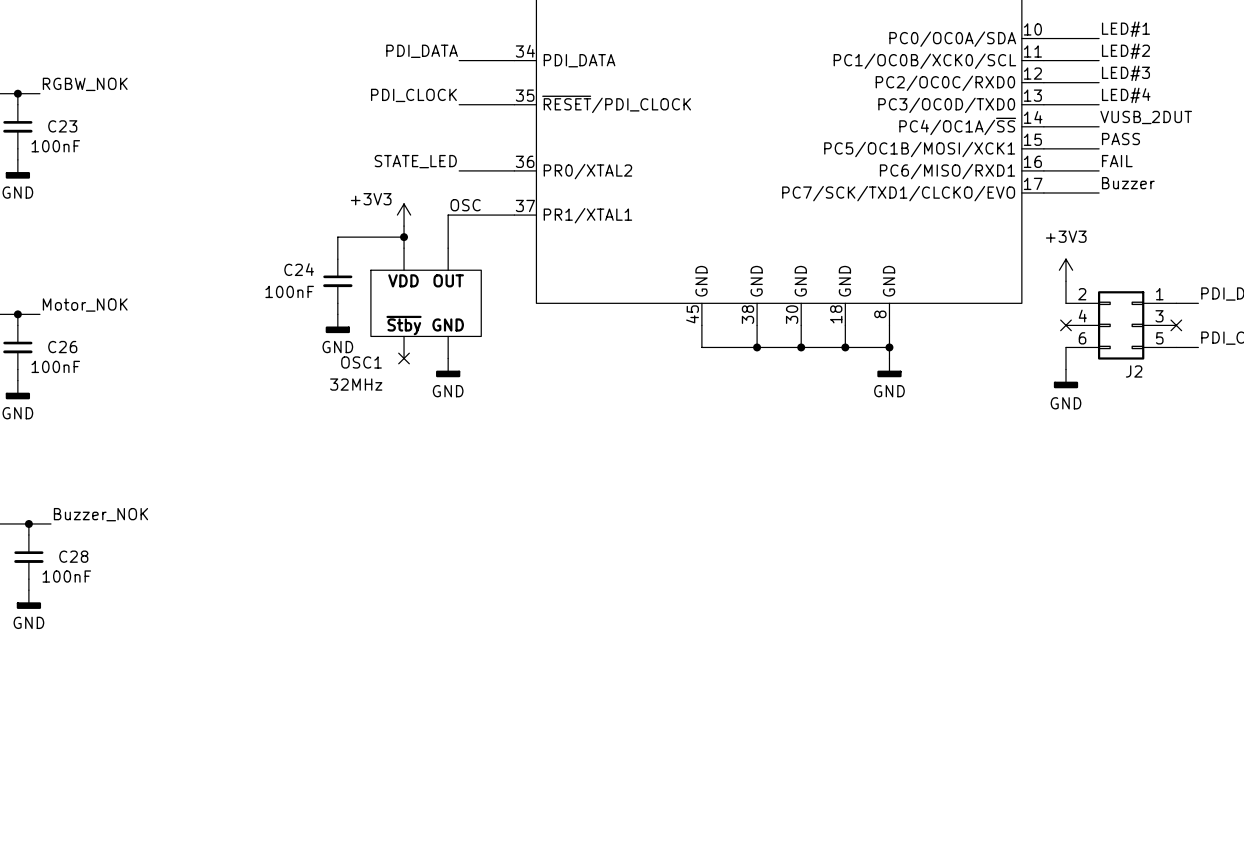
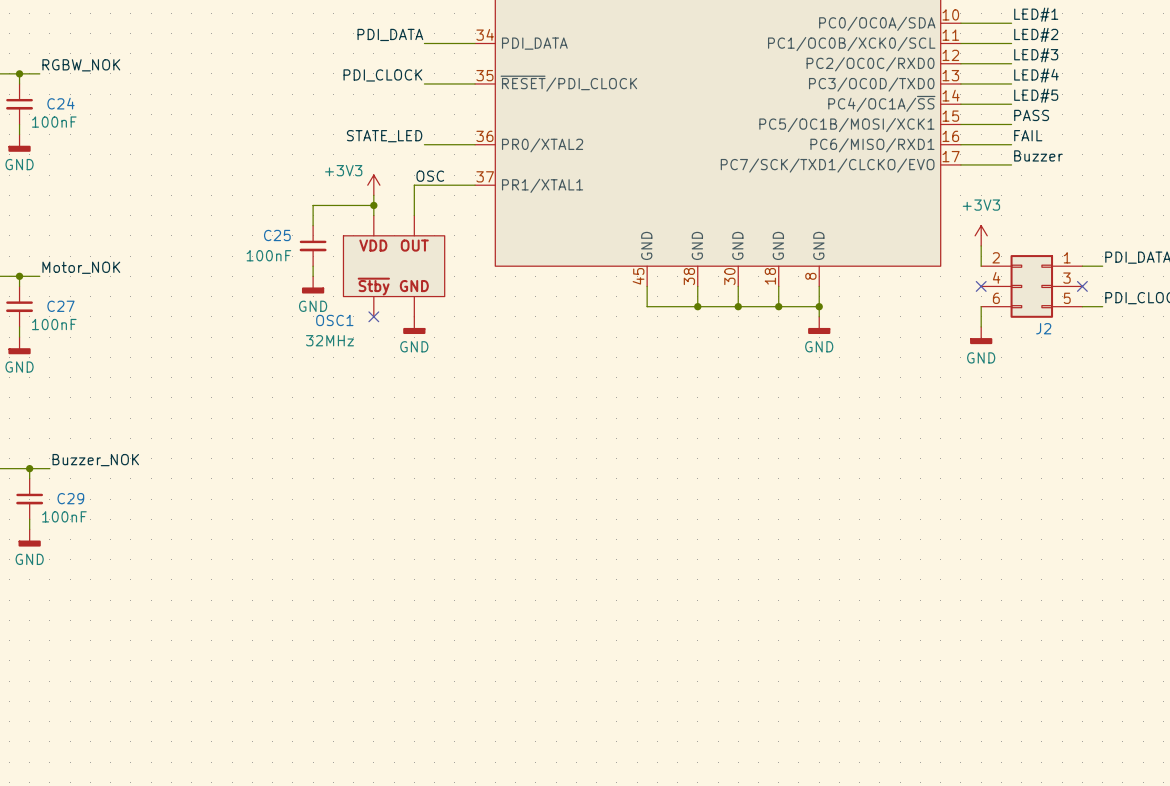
label: VUSB_2DUT (1146, 117) -> LED#5 (1036, 95)
C23 name: C23 (62, 126) -> C24 (60, 103)
C24 name: C24 (299, 269) -> C25 (277, 235)
C26 name: C26 (62, 347) -> C27 (60, 306)
C28 name: C28 (73, 556) -> C29 (70, 498)

